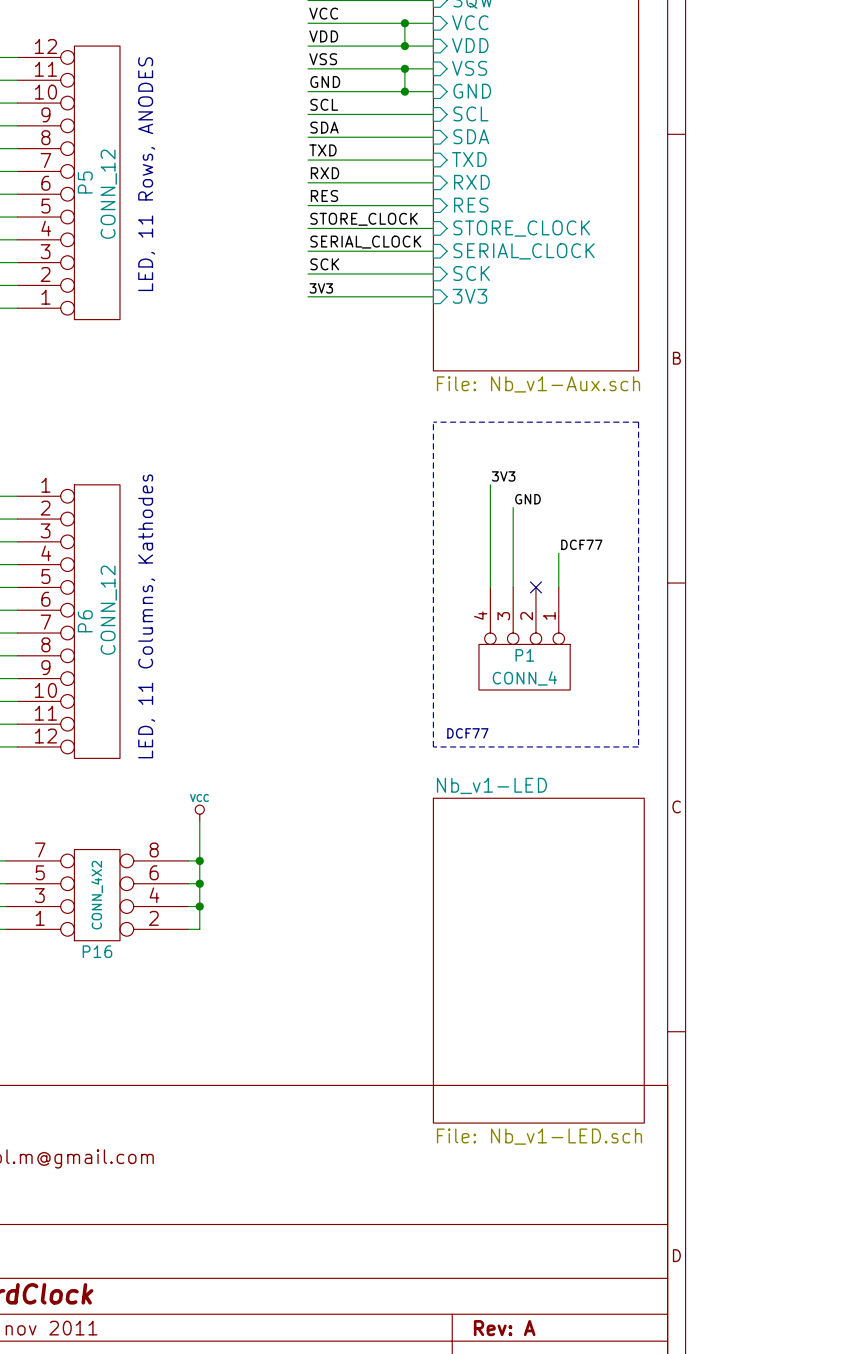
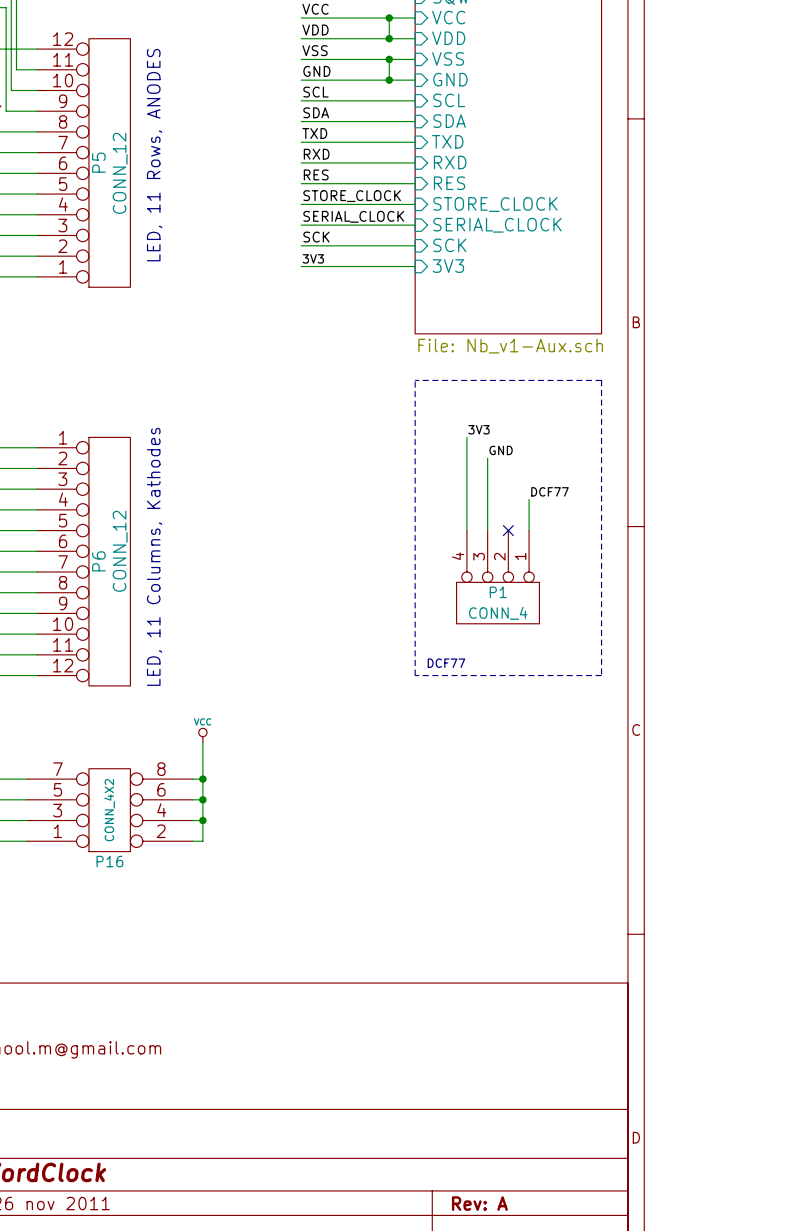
sheet Nb_v1-LED: File: Nb_v1-LED.sch (538, 960) -> none

